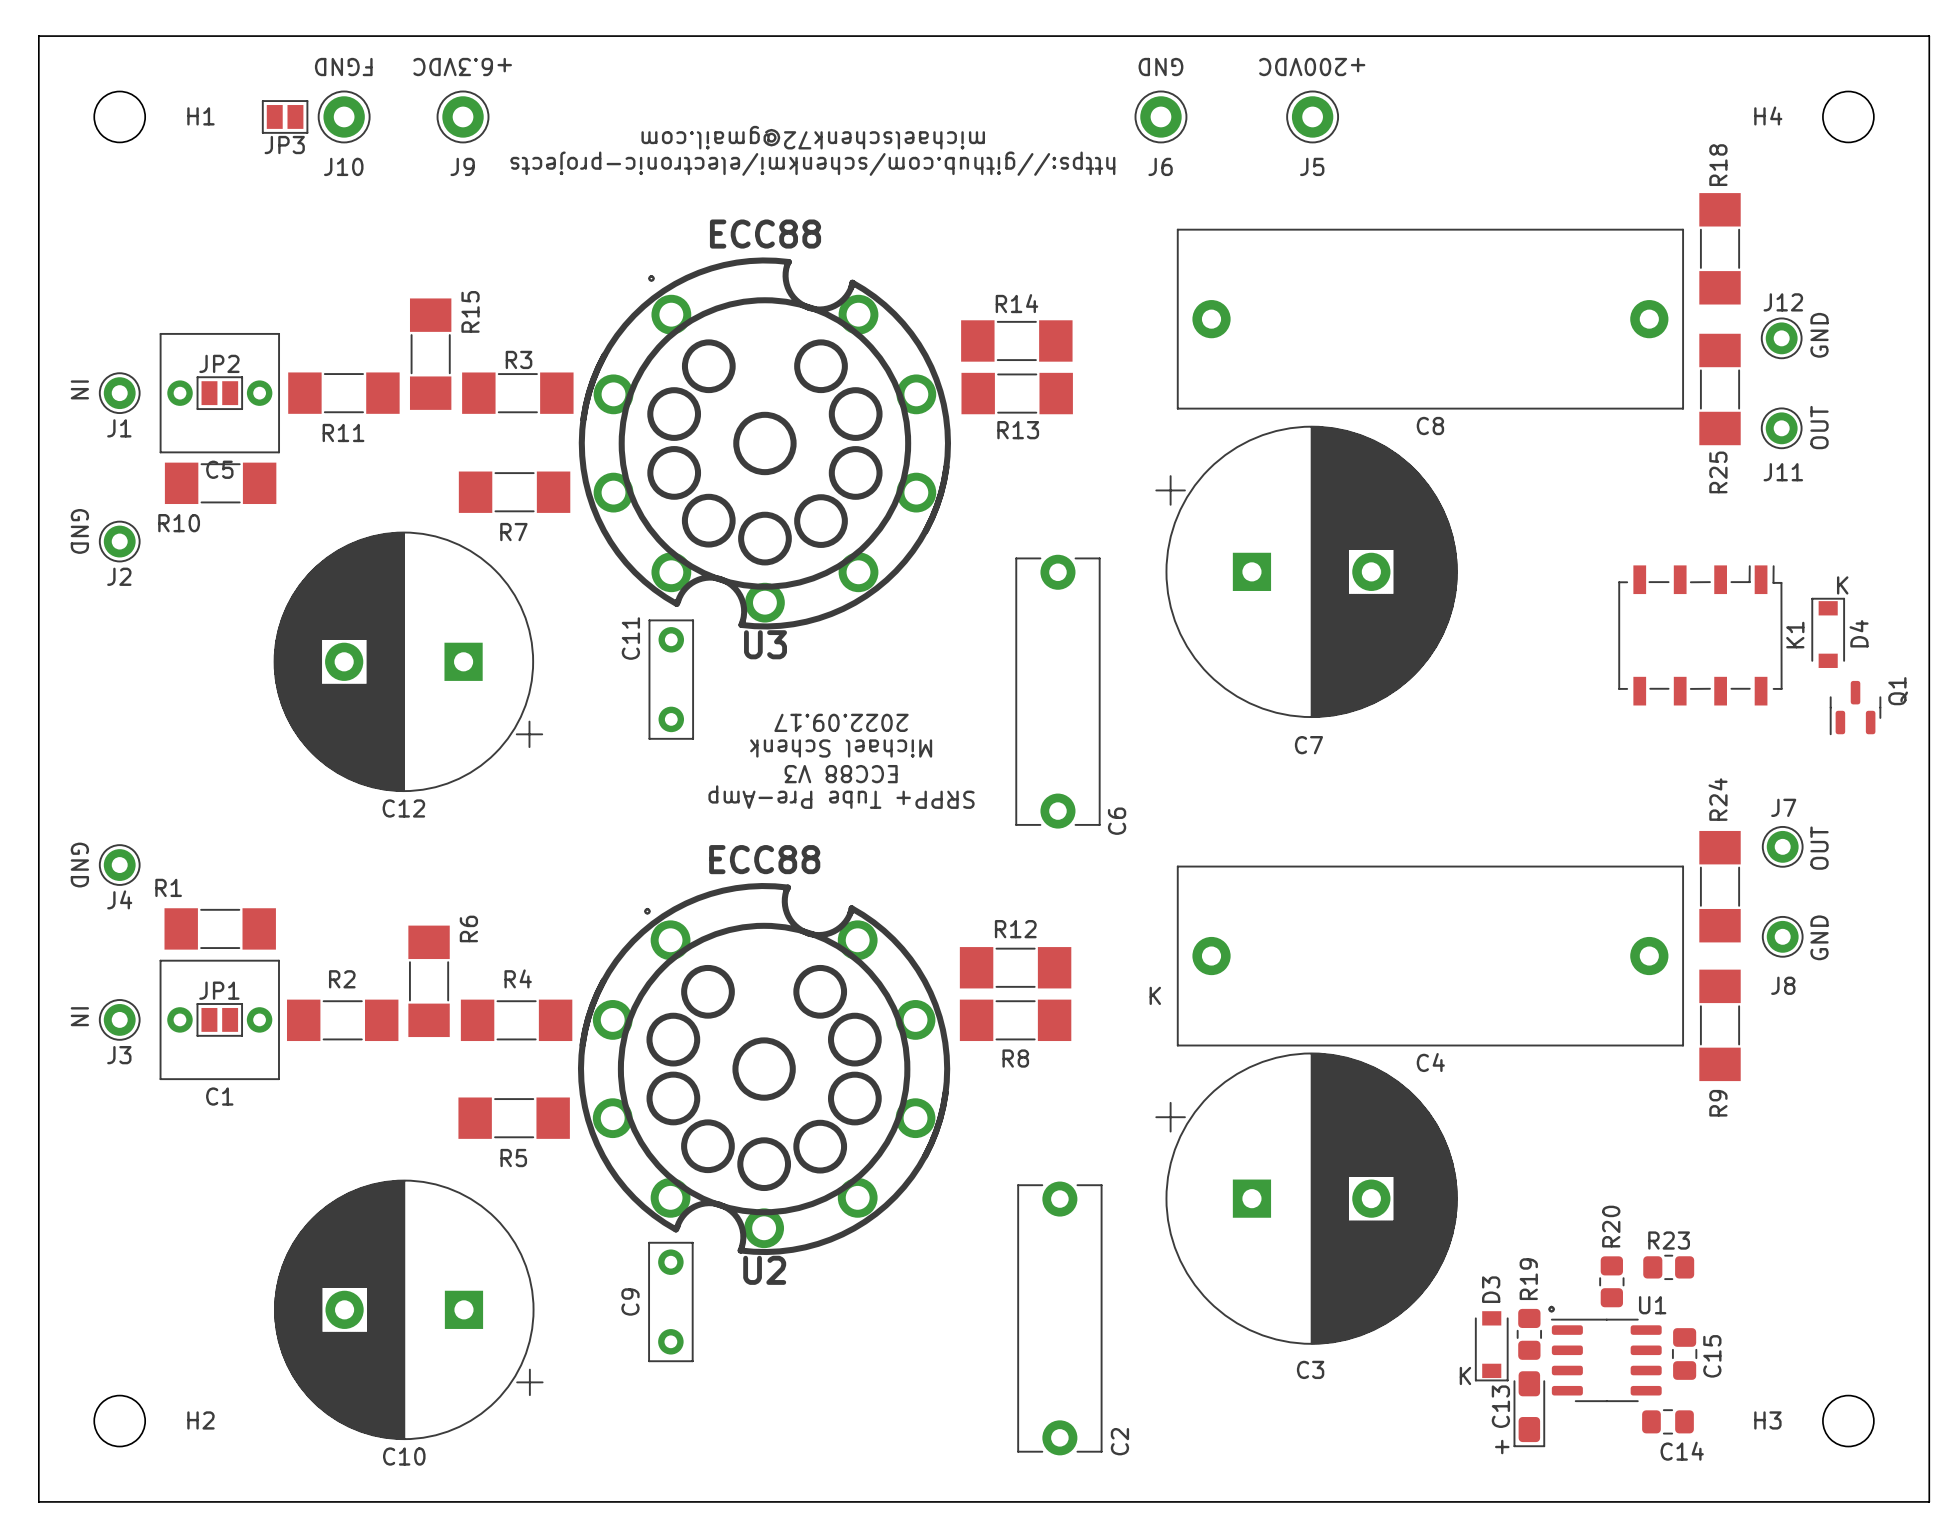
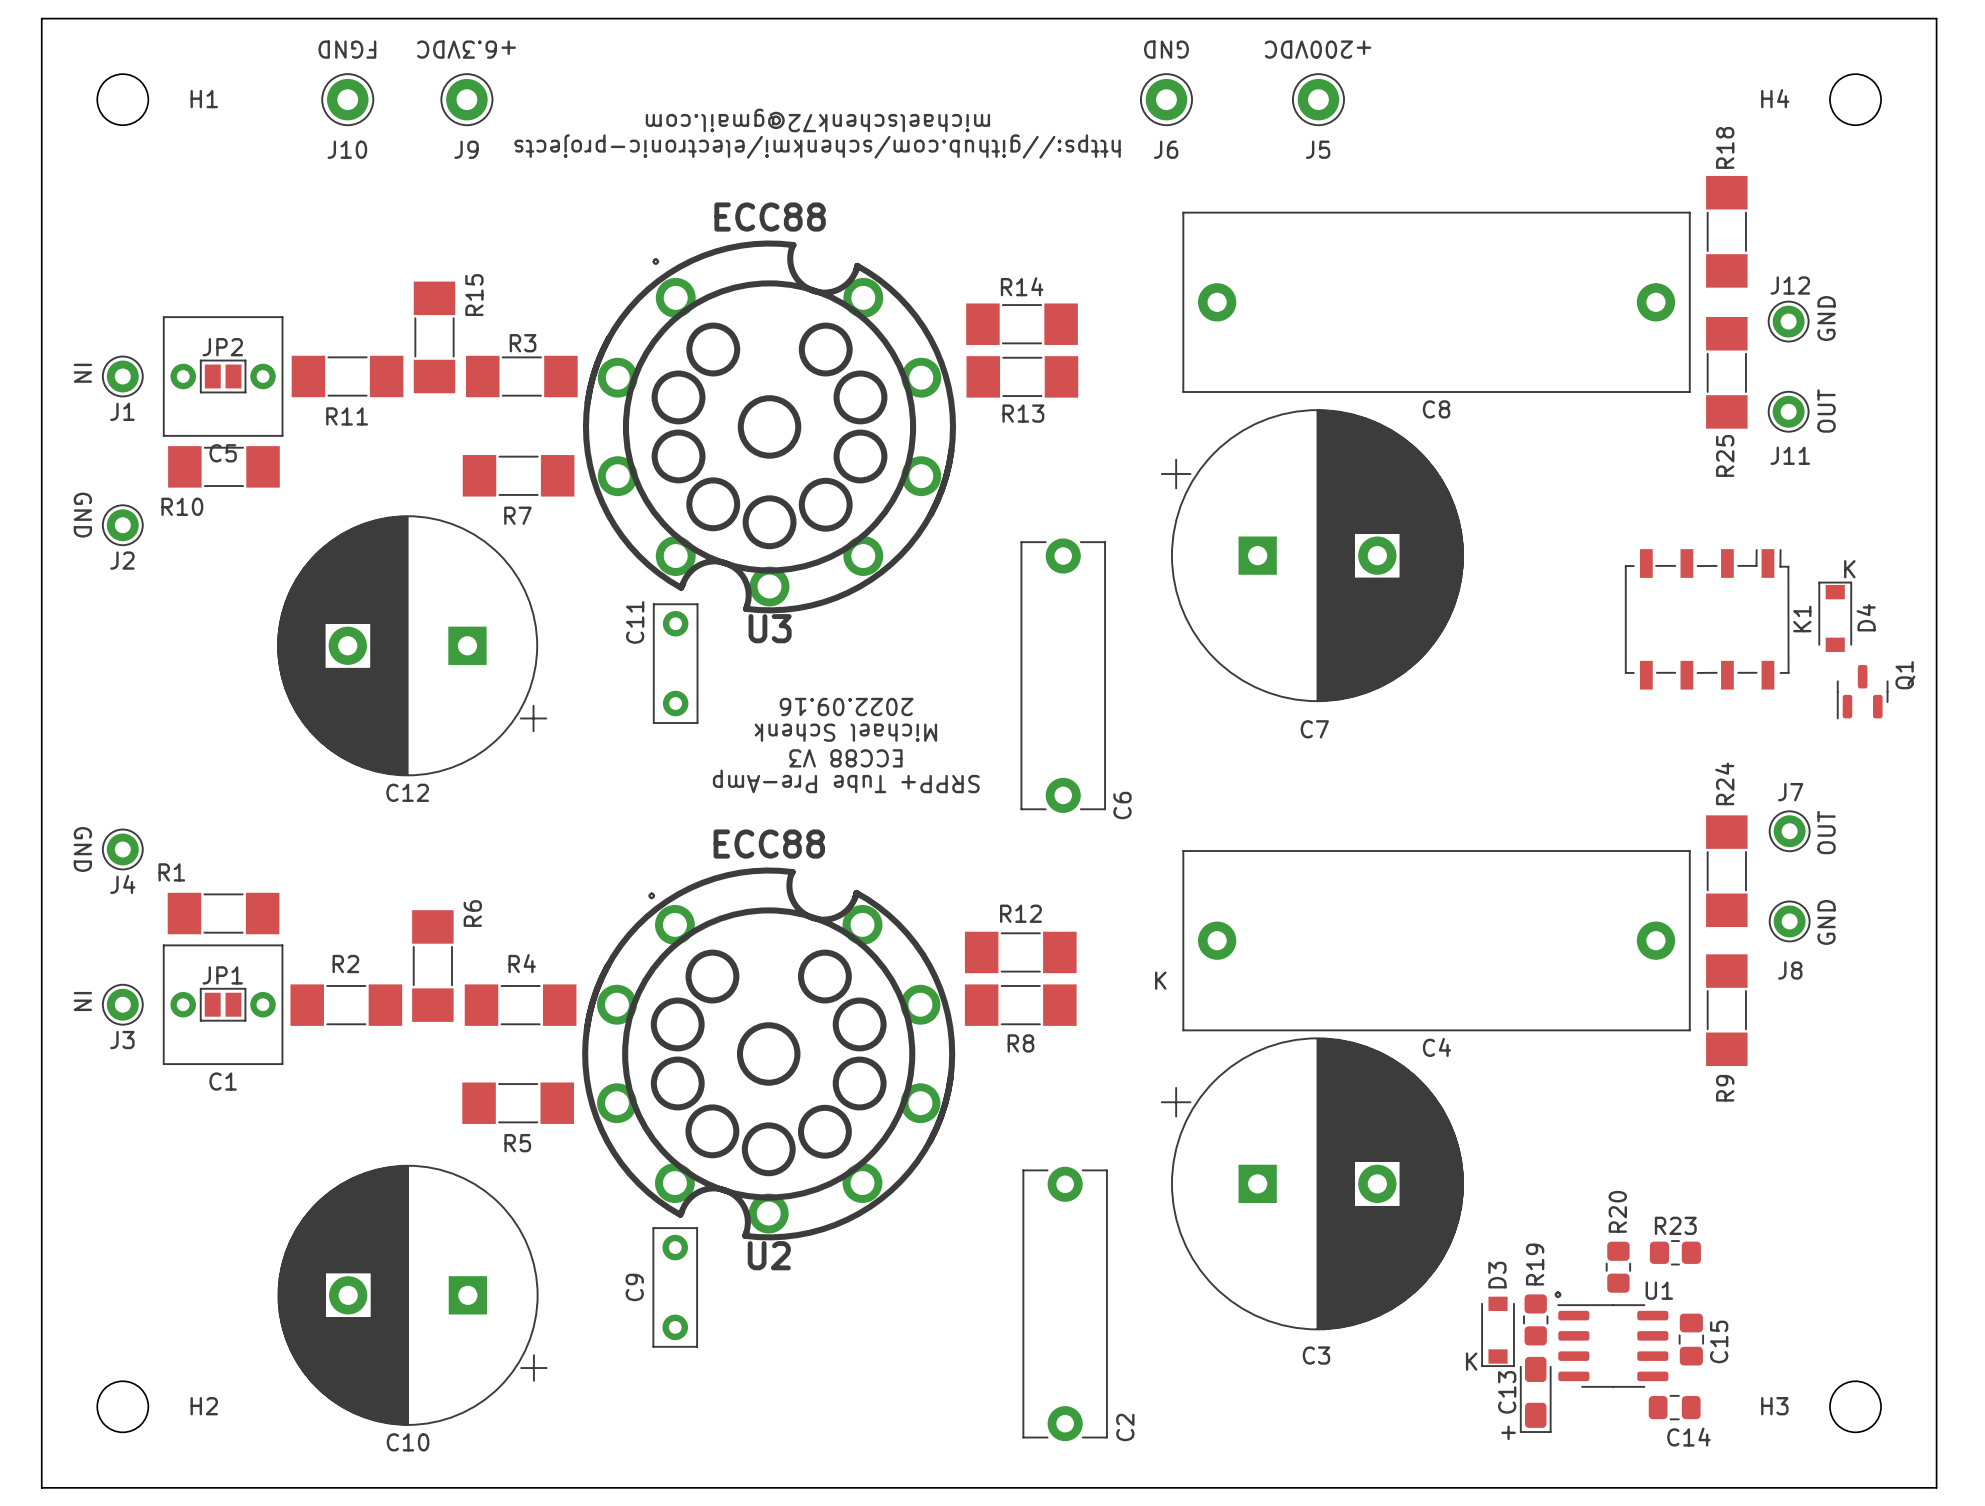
JP3: (285, 116) -> none
text: 2022.09.17 (841, 722) -> 2022.09.16 (846, 706)

